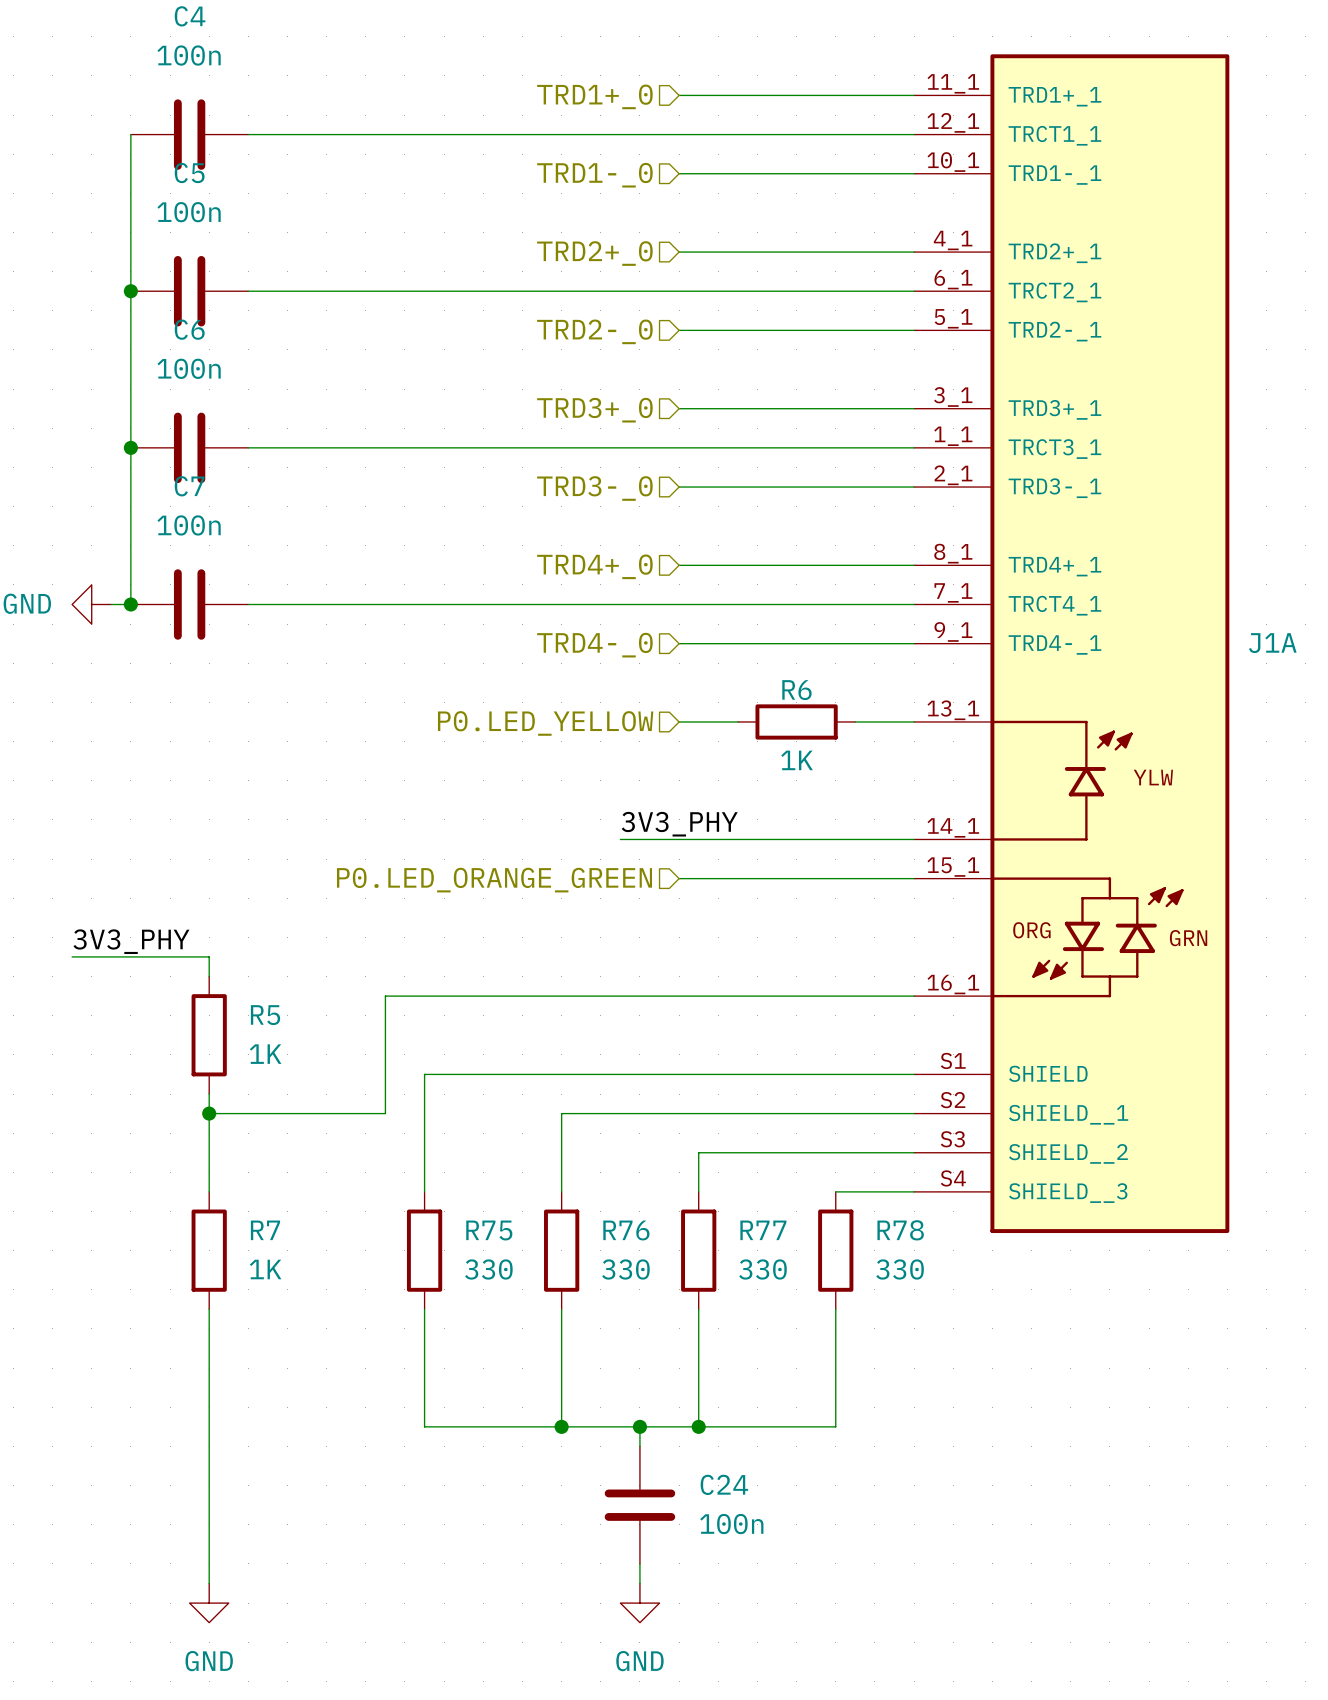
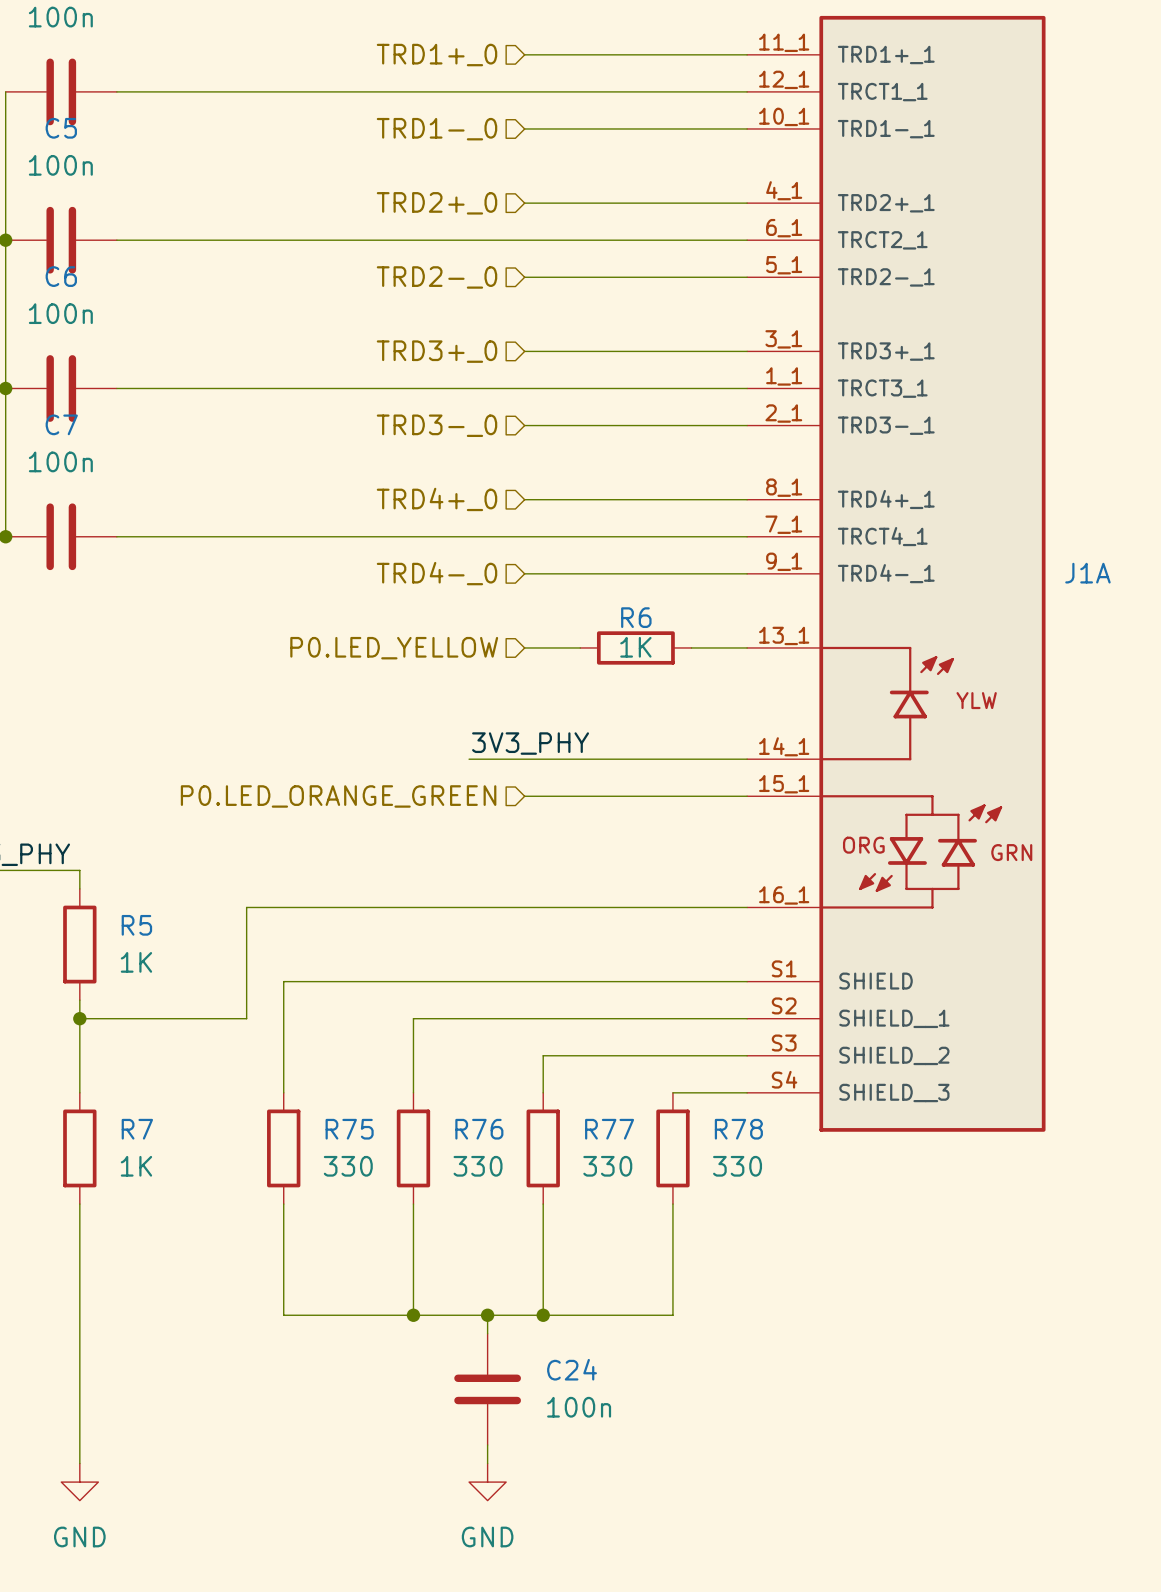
R6 value position: 1K (797, 760) -> 1K (635, 647)

